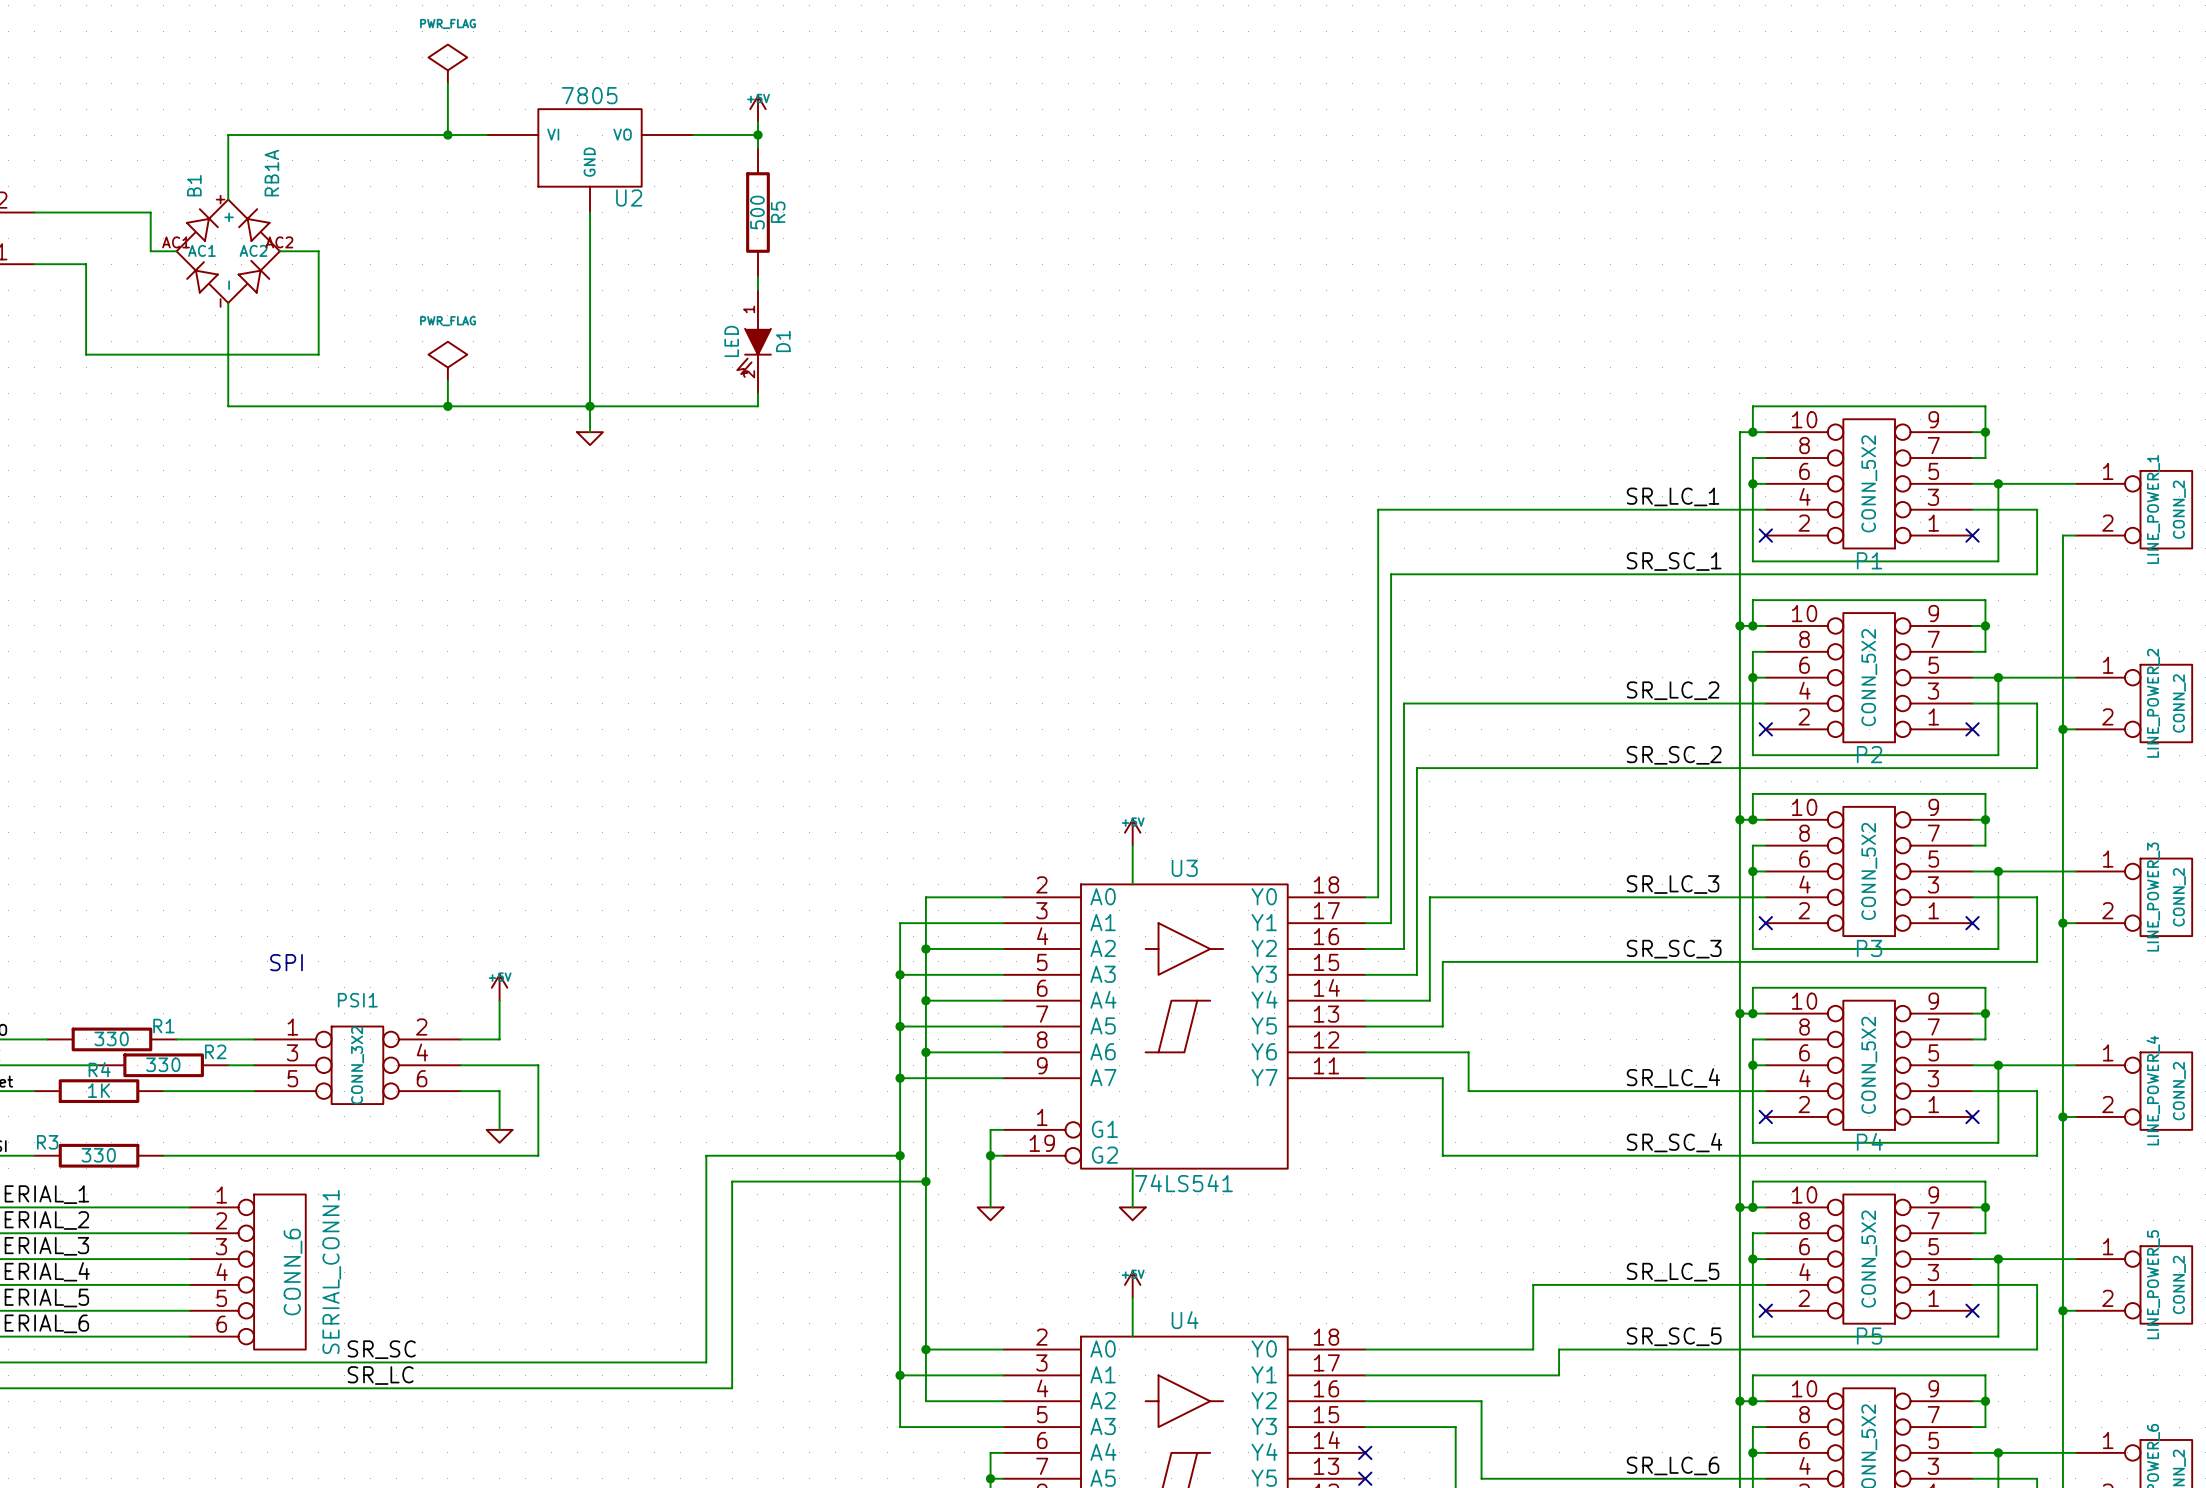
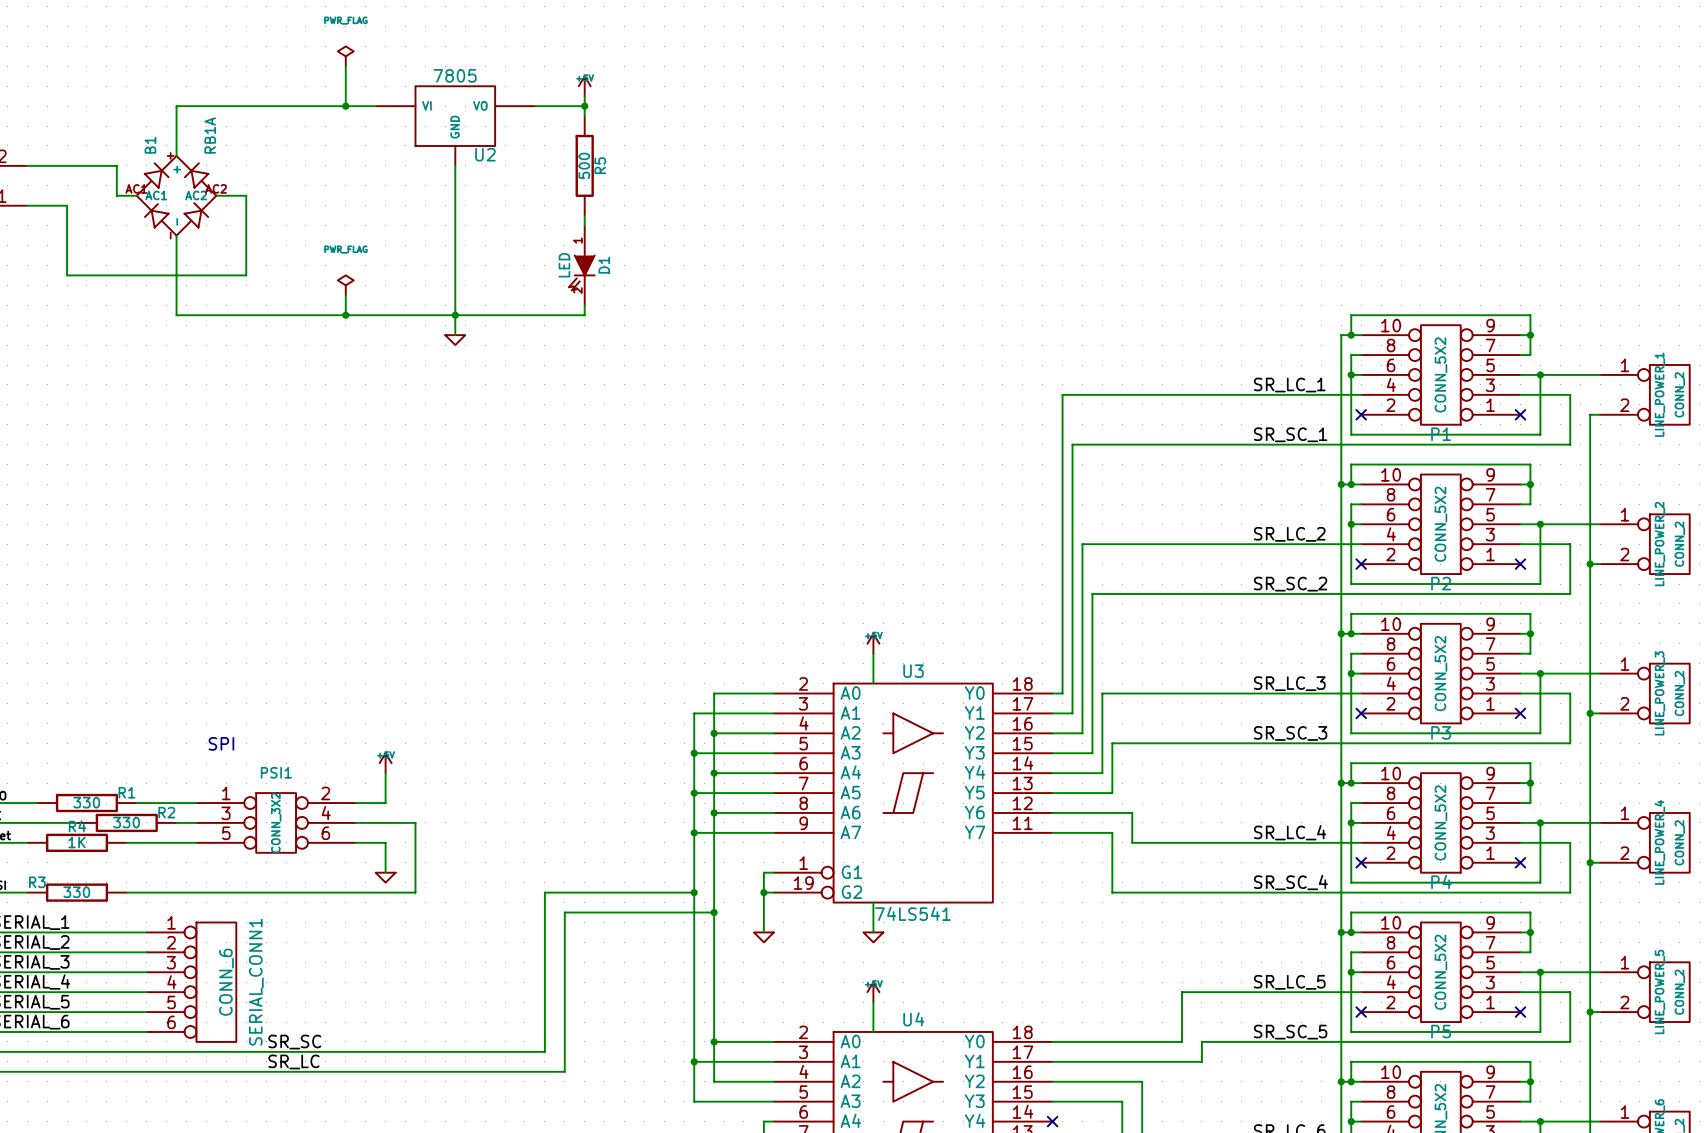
power symbol shape: [428, 44, 468, 84] -> [337, 46, 354, 67]
power symbol shape: [428, 341, 468, 381] -> [337, 275, 354, 296]

